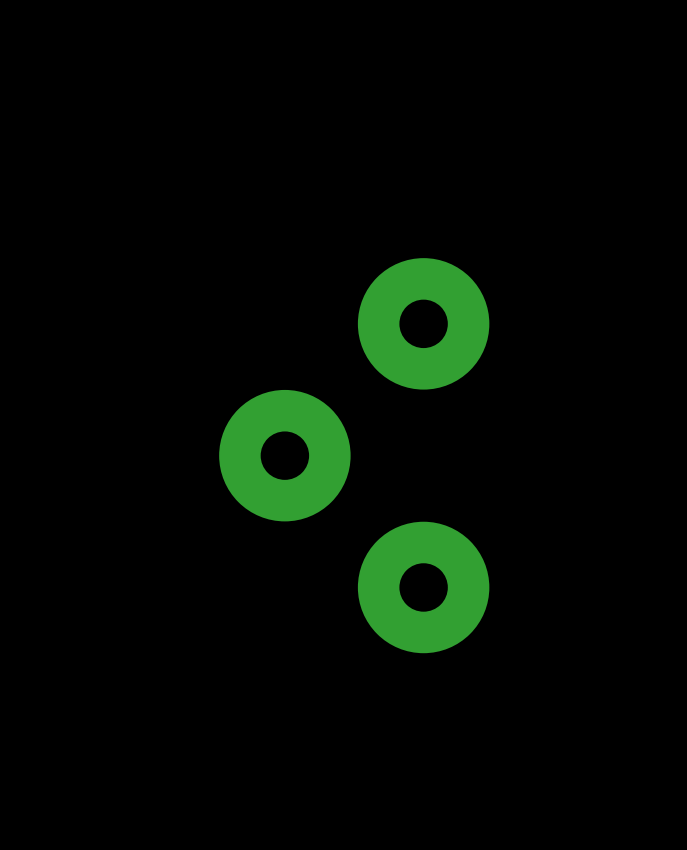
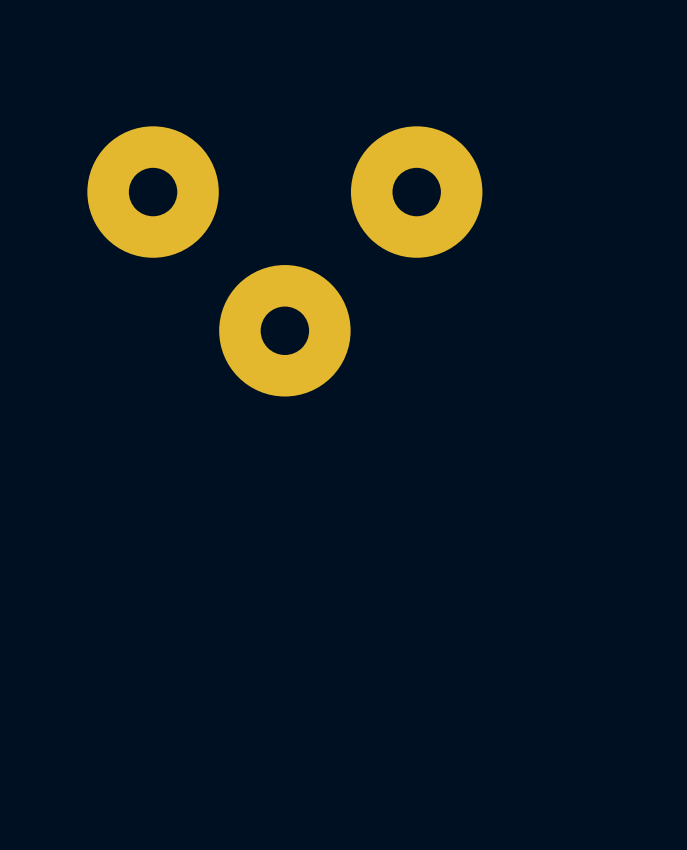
part rotation: 0° (354, 455) -> 90° counterclockwise (284, 261)

